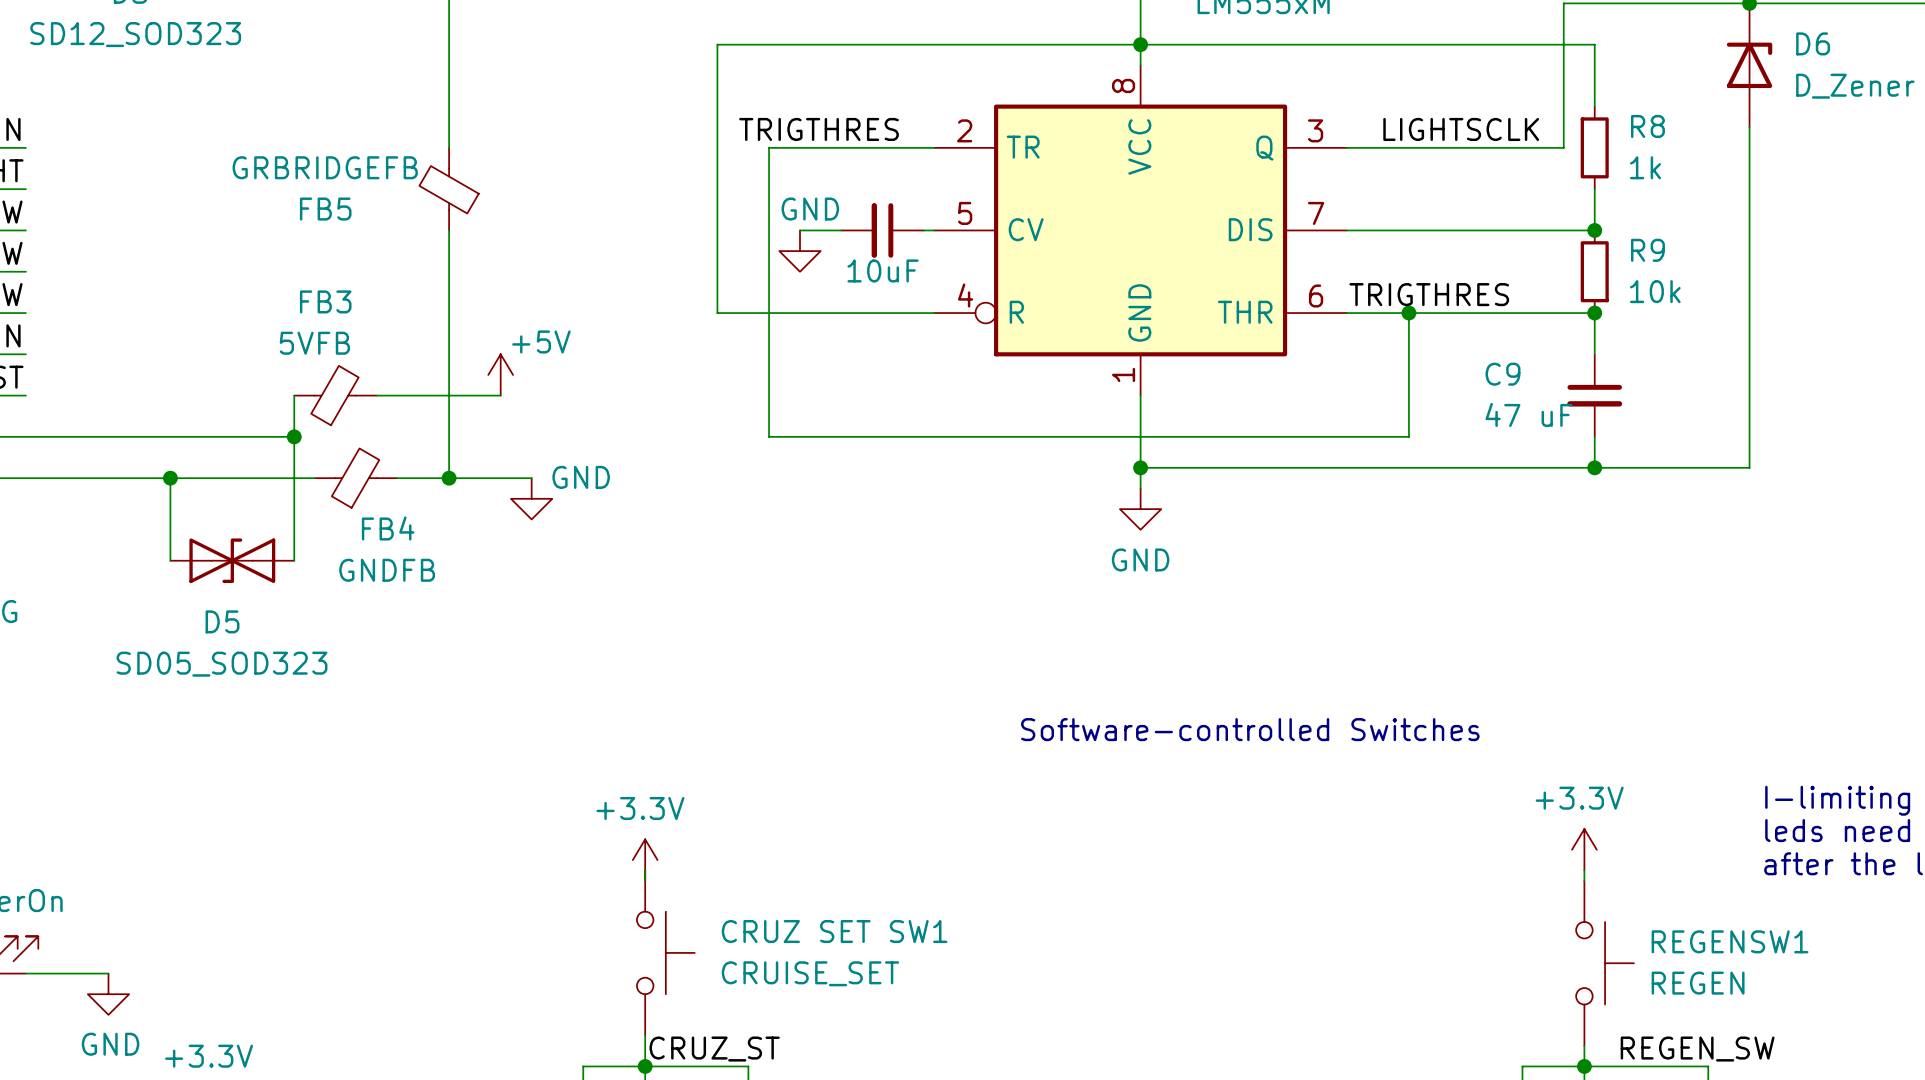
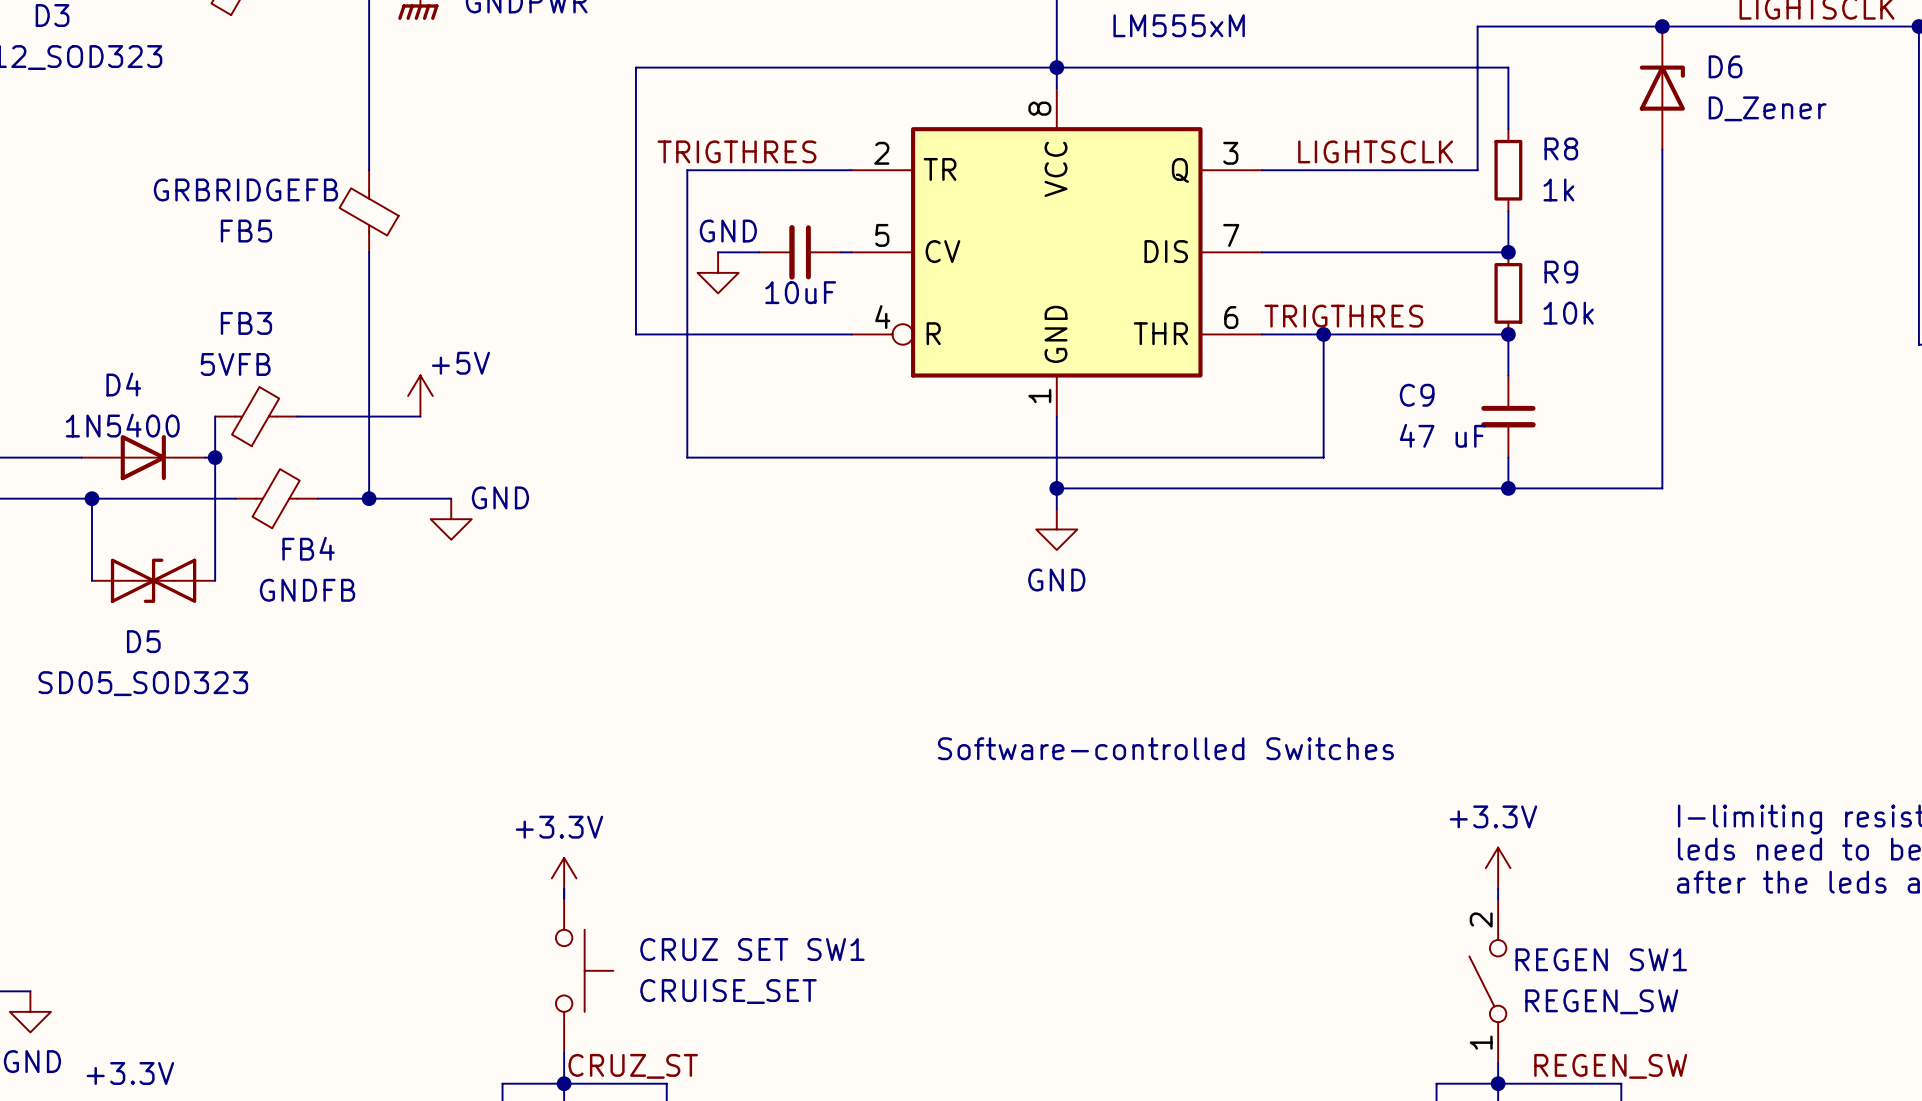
D4: none -> 1N5400 (143, 457)
REGEN SW1: none -> REGEN_SW (1487, 981)
REGENSW1: REGEN (1605, 963) -> none

